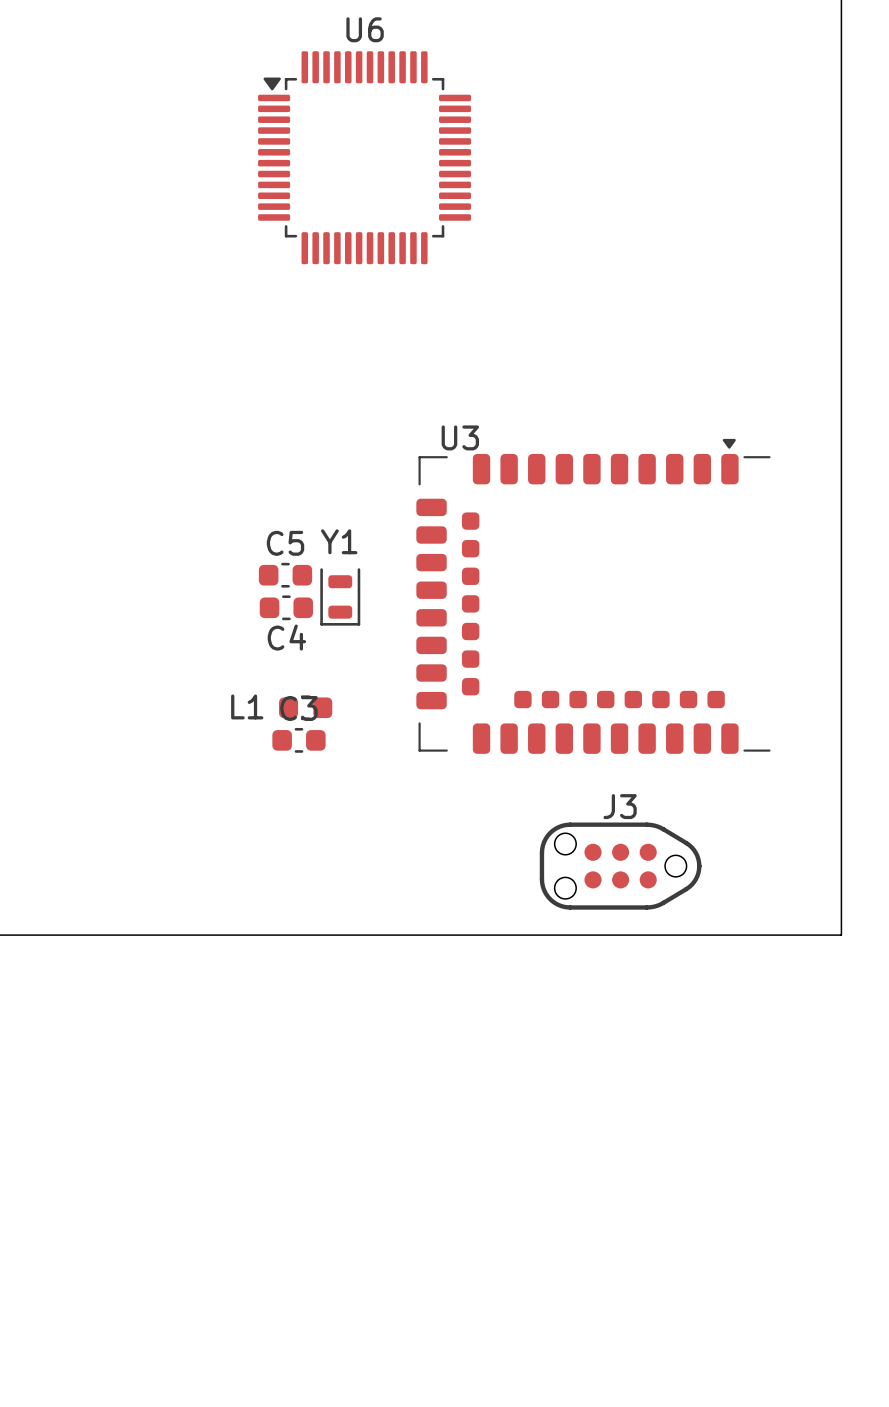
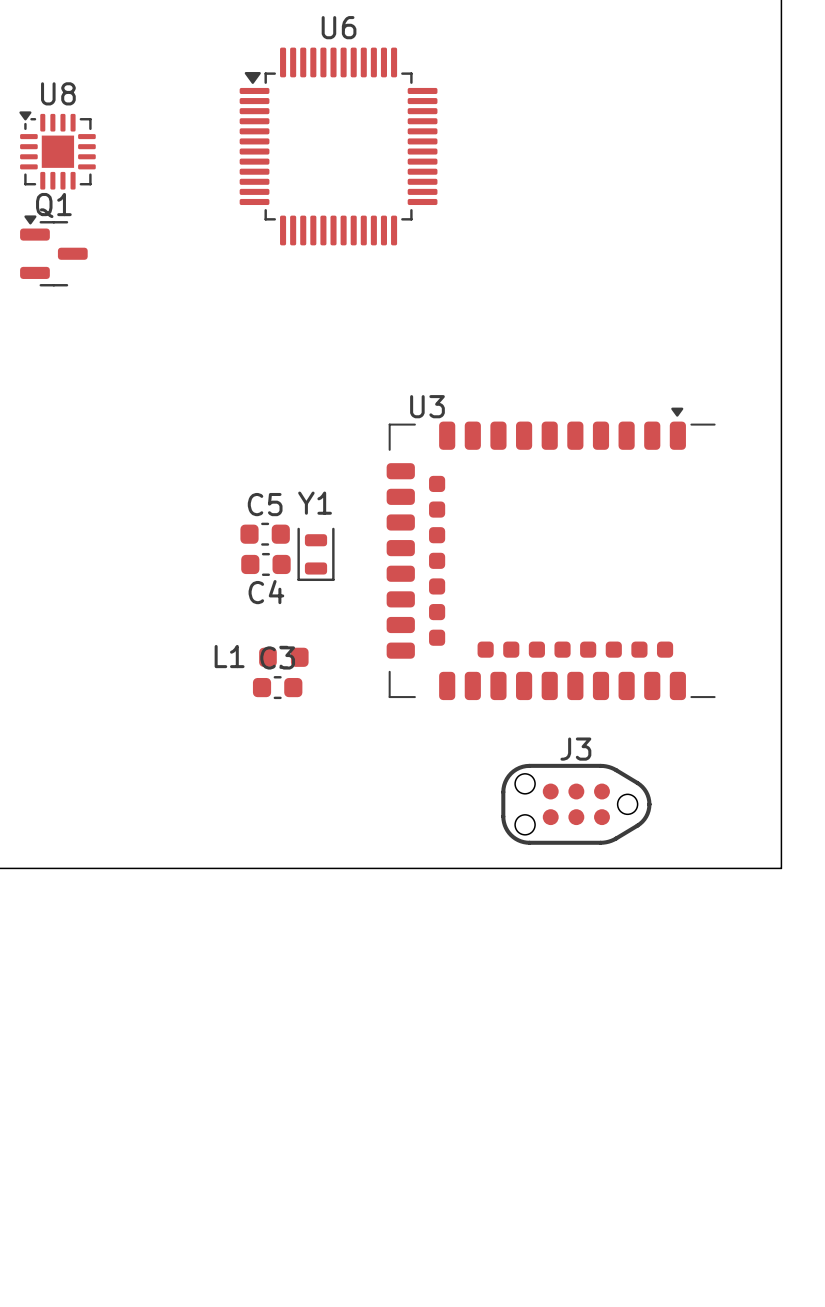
U8: none -> (57, 150)
Q1: none -> (53, 250)

